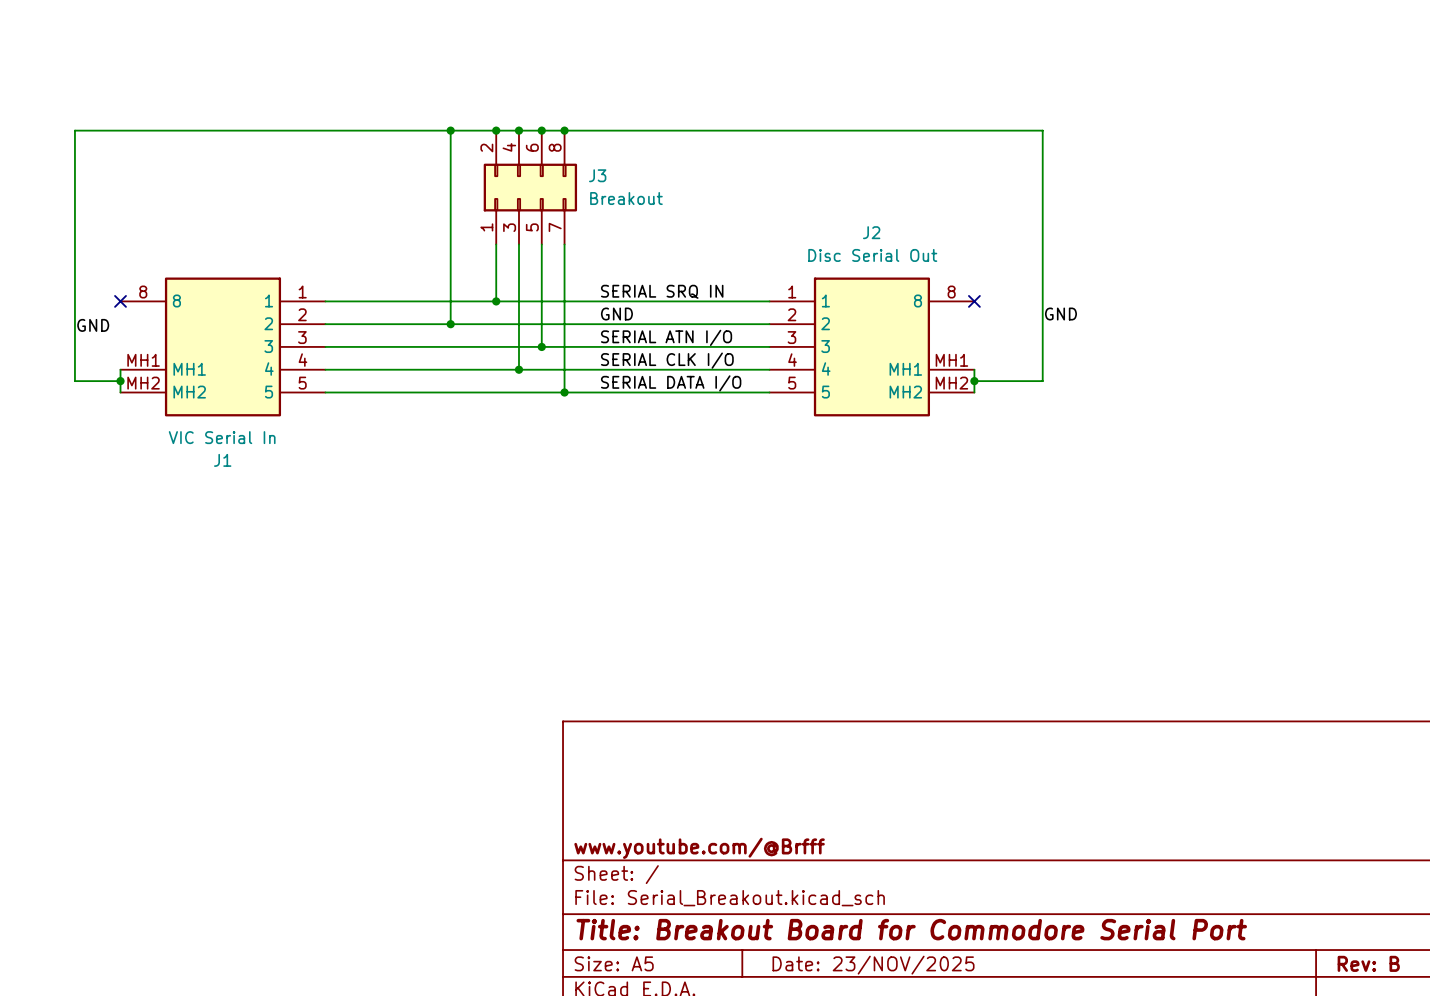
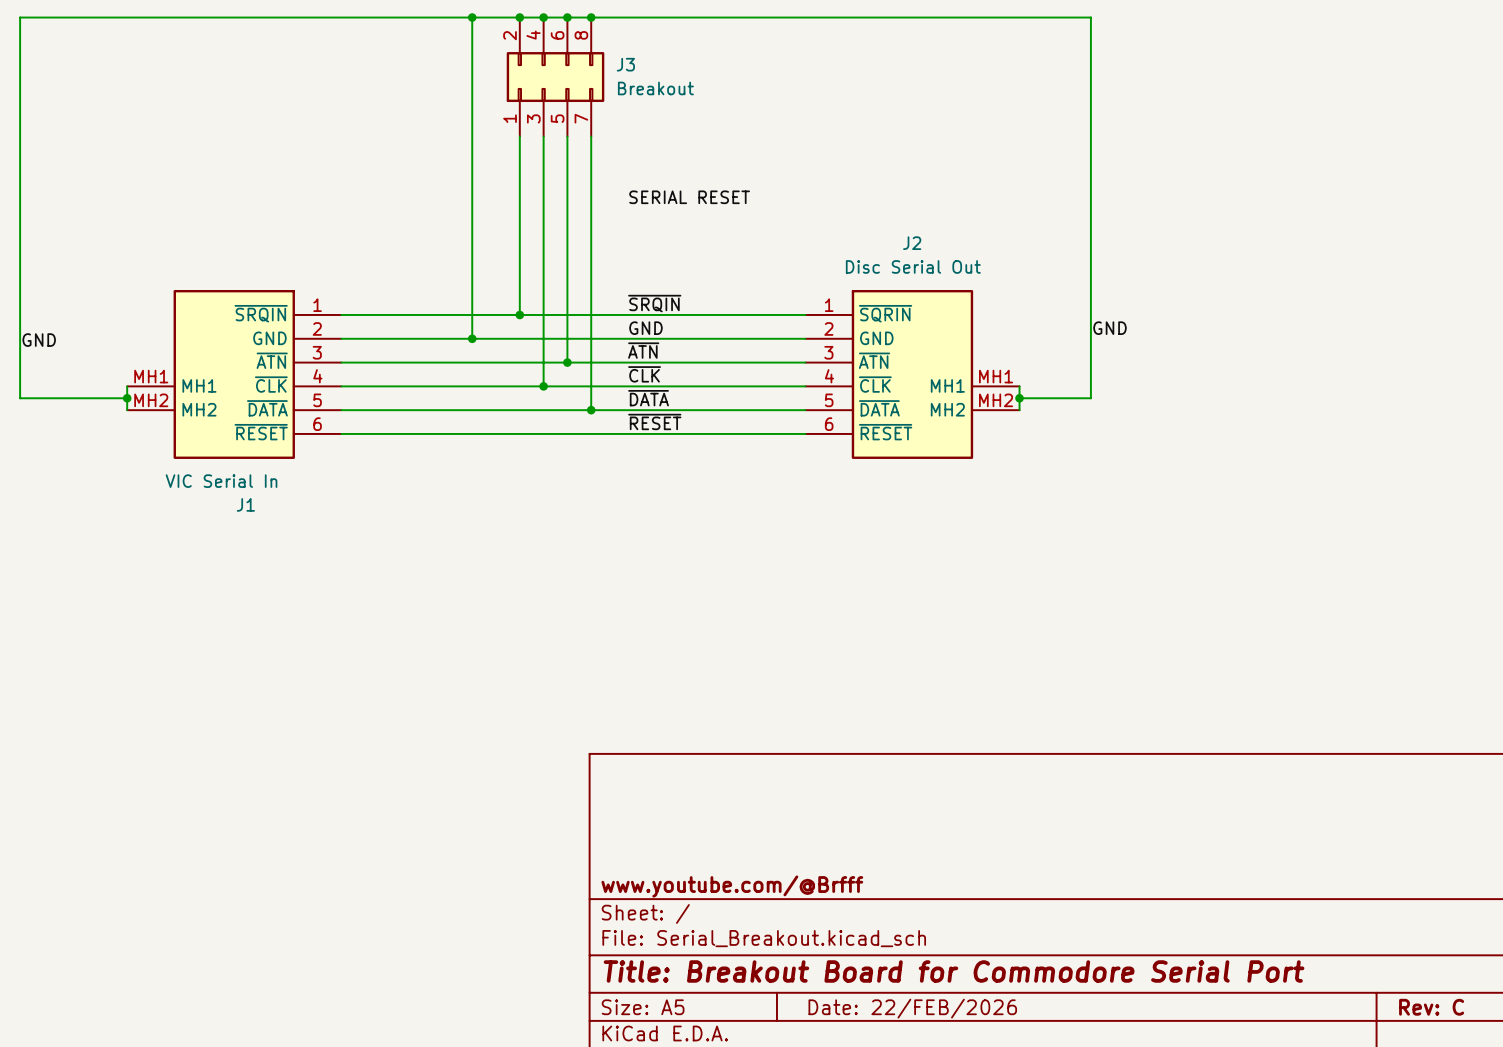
wire: none -> (472, 17) (472, 136)
junction: none -> (472, 17)
junction: none -> (519, 17)
junction: none -> (543, 17)
junction: none -> (567, 17)
junction: none -> (591, 17)
junction: (450, 130) -> none
junction: (496, 130) -> none
junction: (519, 130) -> none
junction: (541, 130) -> none
junction: (564, 130) -> none
wire: (1042, 130) (74, 130) (74, 381) -> (1090, 136) (1090, 17) (20, 17) (20, 398) (79, 398)
J3 position: (530, 187) -> (555, 77)
label: none -> SERIAL RESET (689, 197)
J1 symbol: [120, 277, 326, 417] -> [127, 290, 342, 459]
J2 symbol: [769, 277, 975, 417] -> [805, 290, 1020, 459]
label: SERIAL SRQ IN (662, 291) -> ~{SRQIN} (654, 303)
no-connect mark: (120, 301) -> none
no-connect mark: (974, 301) -> none
label position: GND (93, 325) -> GND (39, 340)
label: SERIAL ATN I/O (666, 337) -> ~{ATN} (643, 350)
label: SERIAL CLK I/O (667, 360) -> ~{CLK} (644, 374)
label: SERIAL DATA I/O (671, 383) -> ~{DATA} (648, 398)
label: none -> ~{RESET} (654, 421)
wire: none -> (341, 433) (805, 433)
title block: Rev: B (1368, 963) -> Rev: C (1431, 1007)
title block: Date: 23/NOV/2025 (873, 965) -> Date: 22/FEB/2026 (912, 1008)

